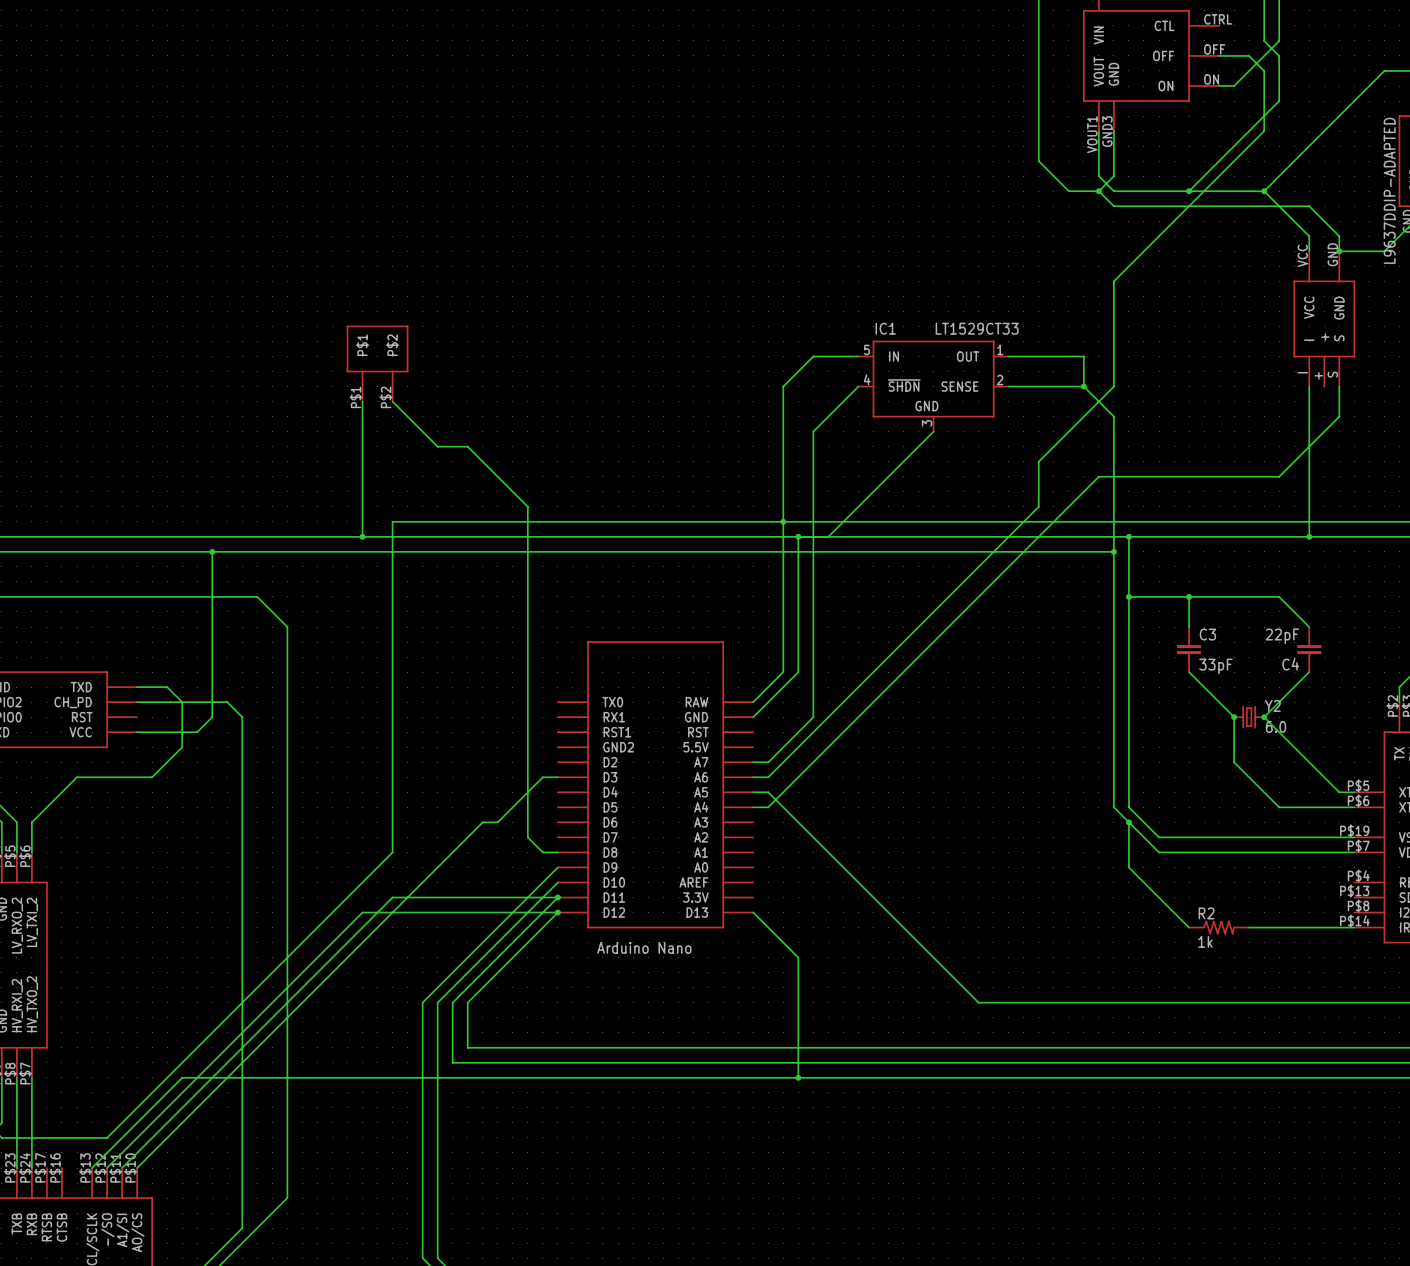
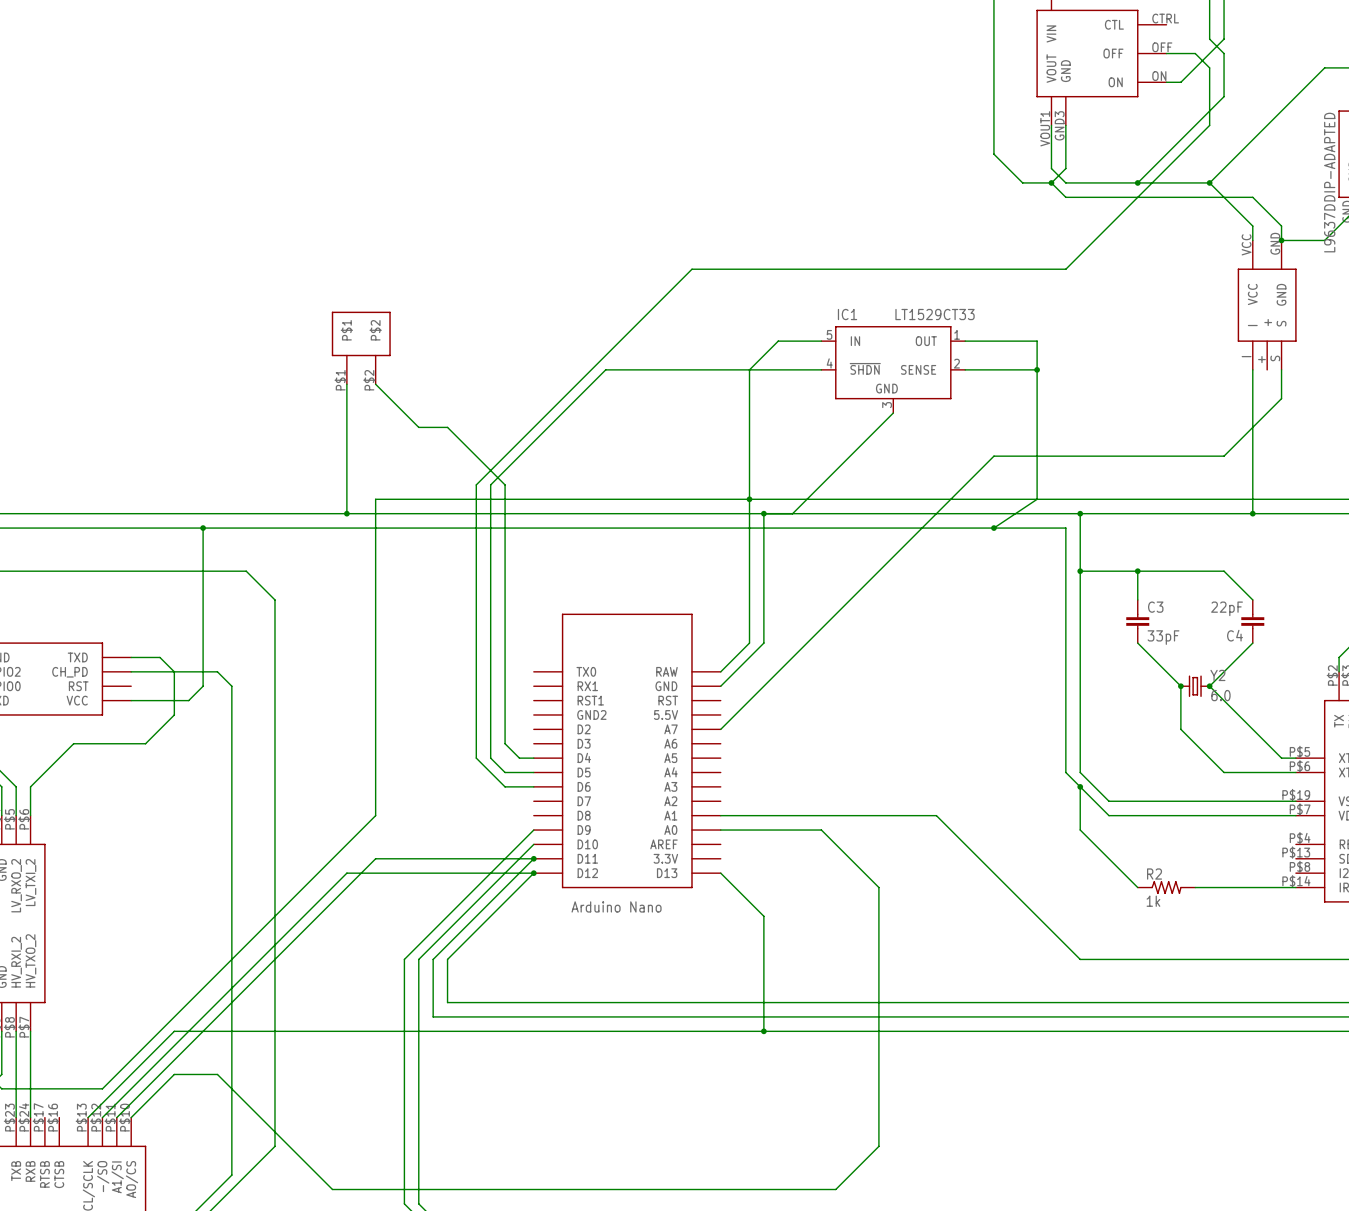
wire: (1113, 281) (1113, 386) (1038, 461) (1038, 506) (768, 777) (753, 777) -> (1065, 269) (691, 269) (476, 484) (476, 758) (505, 786) (533, 786)
wire: (858, 386) (813, 431) (813, 717) (768, 762) (753, 762) -> (821, 369) (605, 369) (490, 484) (490, 758) (505, 772) (533, 772)
wire: (1083, 386) (1113, 416) (1113, 551) -> (1037, 369) (1037, 499) (993, 528)
wire: (1098, 476) (768, 807) (753, 807) -> (1051, 456) (993, 456) (720, 729)
junction: none -> (993, 528)
junction: (1113, 551) -> none
wire: (527, 777) (527, 837) (542, 852) (557, 852) -> (505, 743) (519, 758) (533, 758)
wire: (557, 777) (542, 777) (497, 822) (482, 822) (182, 1122) -> (720, 830) (821, 830) (878, 887) (878, 1146) (835, 1189) (332, 1189) (217, 1074) (174, 1074)
wire: (753, 792) (768, 792) (978, 1002) (1128, 1002) -> (720, 815) (936, 815) (1080, 959)

